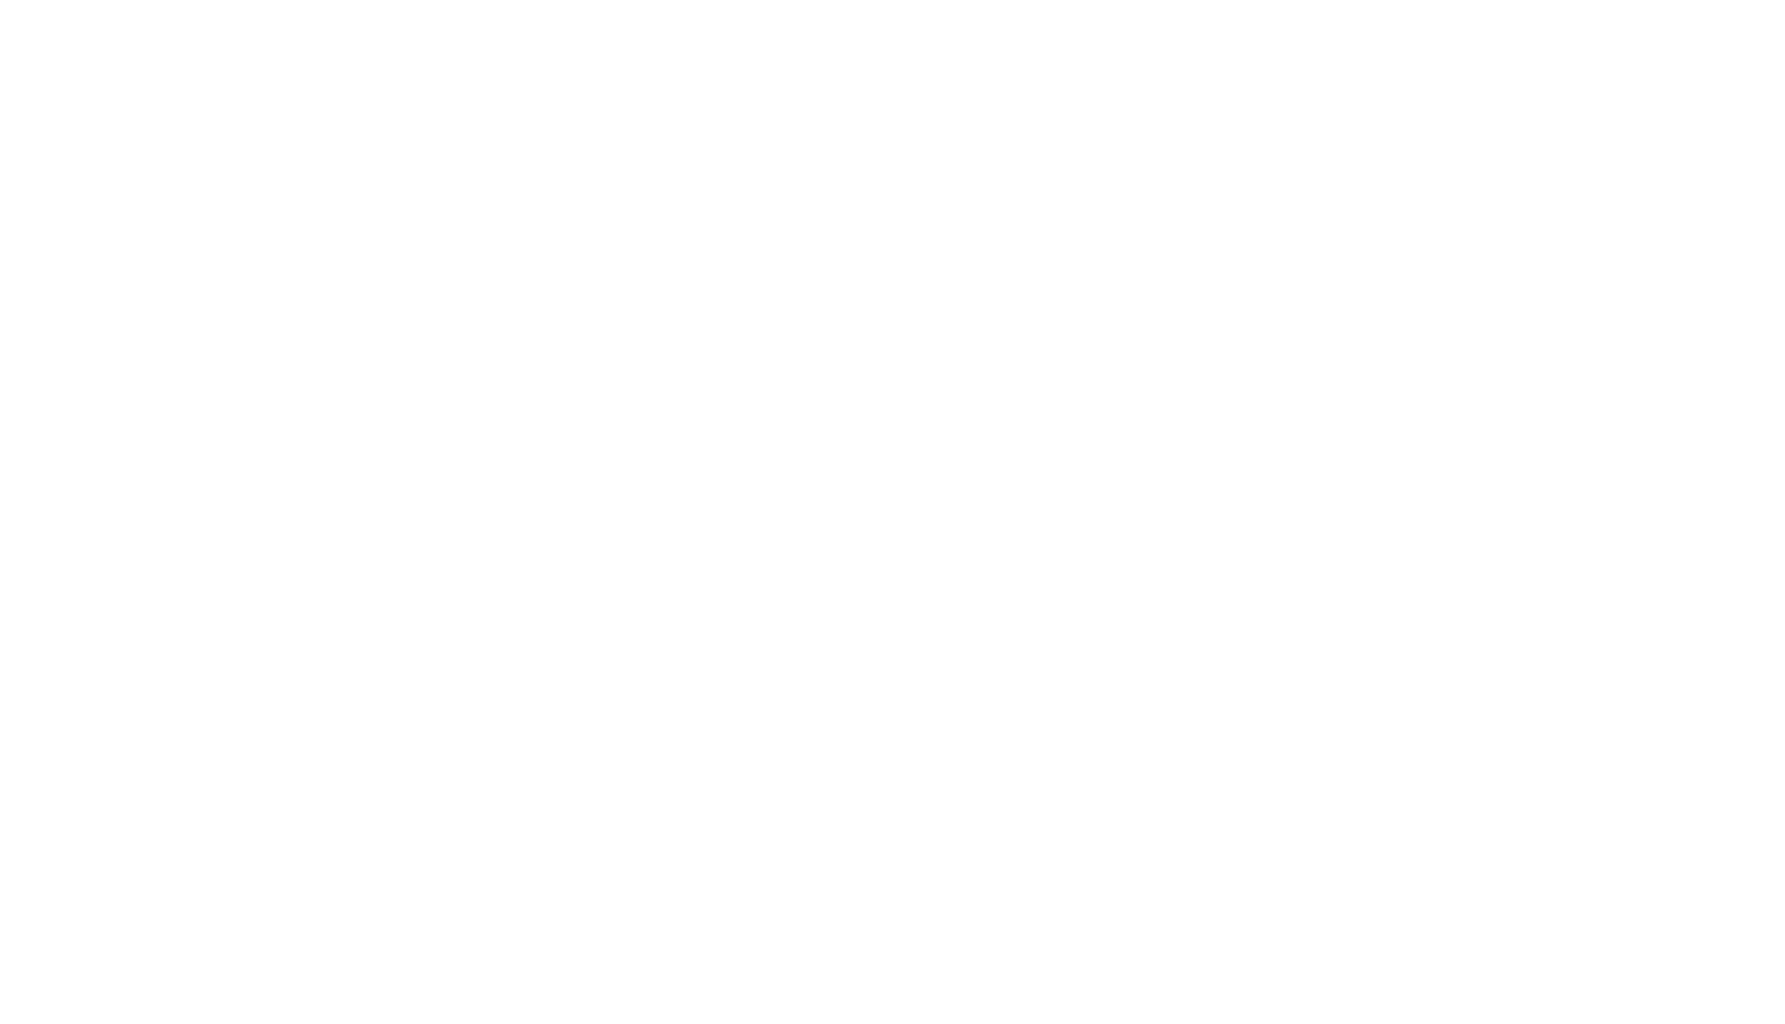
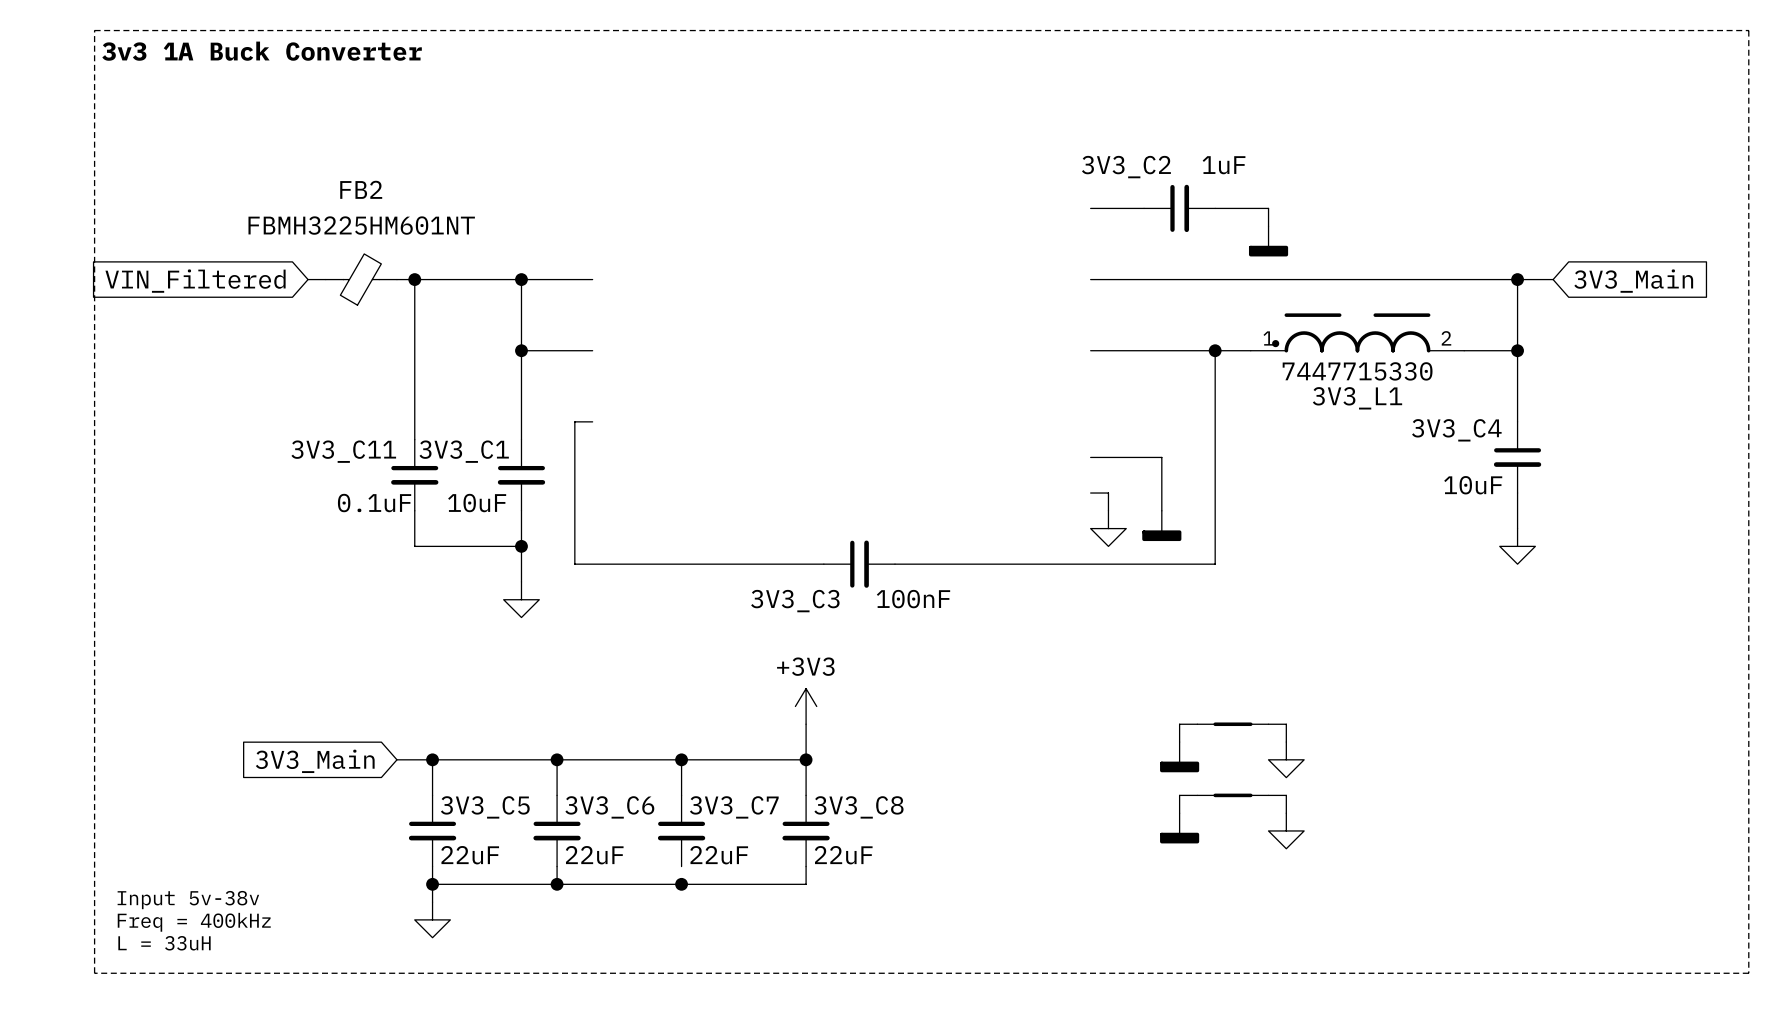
line: none -> (94, 30) (1748, 30) (1748, 973) (94, 973) (94, 30)
text: none -> 3v3 1A Buck Converter (262, 51)
wire: none -> (1090, 208) (1144, 208)
3V3_C2: none -> 1uF (1179, 208)
wire: none -> (1215, 208) (1268, 208) (1268, 226)
power symbol: none -> (1268, 241)
wire: none -> (308, 279) (325, 279)
FB2: none -> FBMH3225HM601NT (361, 279)
wire: none -> (396, 279) (592, 279)
wire: none -> (414, 279) (414, 439)
junction: none -> (414, 279)
wire: none -> (521, 279) (521, 439)
junction: none -> (521, 279)
wire: none -> (1090, 279) (1553, 279)
wire: none -> (1517, 279) (1517, 421)
junction: none -> (1517, 279)
global label: none -> VIN_Filtered (195, 281)
global label: none -> 3V3_Main (1633, 281)
3V3_L1: none -> 7447715330 (1357, 332)
wire: none -> (521, 350) (592, 350)
junction: none -> (521, 350)
wire: none -> (1090, 350) (1250, 350)
wire: none -> (1215, 350) (1215, 564) (895, 564)
junction: none -> (1215, 350)
wire: none -> (1464, 350) (1517, 350)
junction: none -> (1517, 350)
wire: none -> (592, 421) (574, 421) (574, 564) (823, 564)
wire: none -> (1090, 457) (1161, 457) (1161, 510)
3V3_C4: none -> 10uF (1517, 457)
3V3_C11: none -> 0.1uF (414, 475)
3V3_C1: none -> 10uF (521, 475)
wire: none -> (1090, 493) (1108, 493) (1108, 510)
wire: none -> (1517, 493) (1517, 528)
wire: none -> (414, 510) (414, 546) (521, 546)
wire: none -> (521, 510) (521, 581)
power symbol: none -> (1161, 525)
power symbol: none -> (1108, 528)
junction: none -> (521, 546)
power symbol: none -> (1517, 546)
3V3_C3: none -> 100nF (859, 564)
power symbol: none -> (521, 599)
power symbol: none -> +3V3 (806, 706)
wire: none -> (806, 724) (806, 795)
wire: none -> (1197, 724) (1179, 724) (1179, 742)
part: none -> (1232, 724)
wire: none -> (1268, 724) (1286, 724) (1286, 742)
power symbol: none -> (1179, 757)
wire: none -> (396, 759) (806, 759)
wire: none -> (432, 759) (432, 795)
junction: none -> (432, 759)
wire: none -> (557, 759) (557, 795)
junction: none -> (557, 759)
wire: none -> (681, 759) (681, 795)
junction: none -> (681, 759)
junction: none -> (806, 759)
power symbol: none -> (1286, 759)
global label: none -> 3V3_Main (315, 761)
wire: none -> (1197, 795) (1179, 795) (1179, 813)
part: none -> (1232, 795)
wire: none -> (1268, 795) (1286, 795) (1286, 813)
power symbol: none -> (1179, 828)
3V3_C5: none -> 22uF (432, 830)
3V3_C6: none -> 22uF (557, 830)
3V3_C7: none -> 22uF (681, 830)
3V3_C8: none -> 22uF (806, 830)
power symbol: none -> (1286, 830)
wire: none -> (432, 866) (432, 902)
wire: none -> (557, 866) (557, 884)
wire: none -> (806, 866) (806, 884) (432, 884)
junction: none -> (432, 884)
junction: none -> (557, 884)
junction: none -> (681, 884)
text: none -> Input 5v-38v (188, 900)
power symbol: none -> (432, 919)
text: none -> Freq = 400kHz (194, 922)
text: none -> L = 33uH (164, 943)

